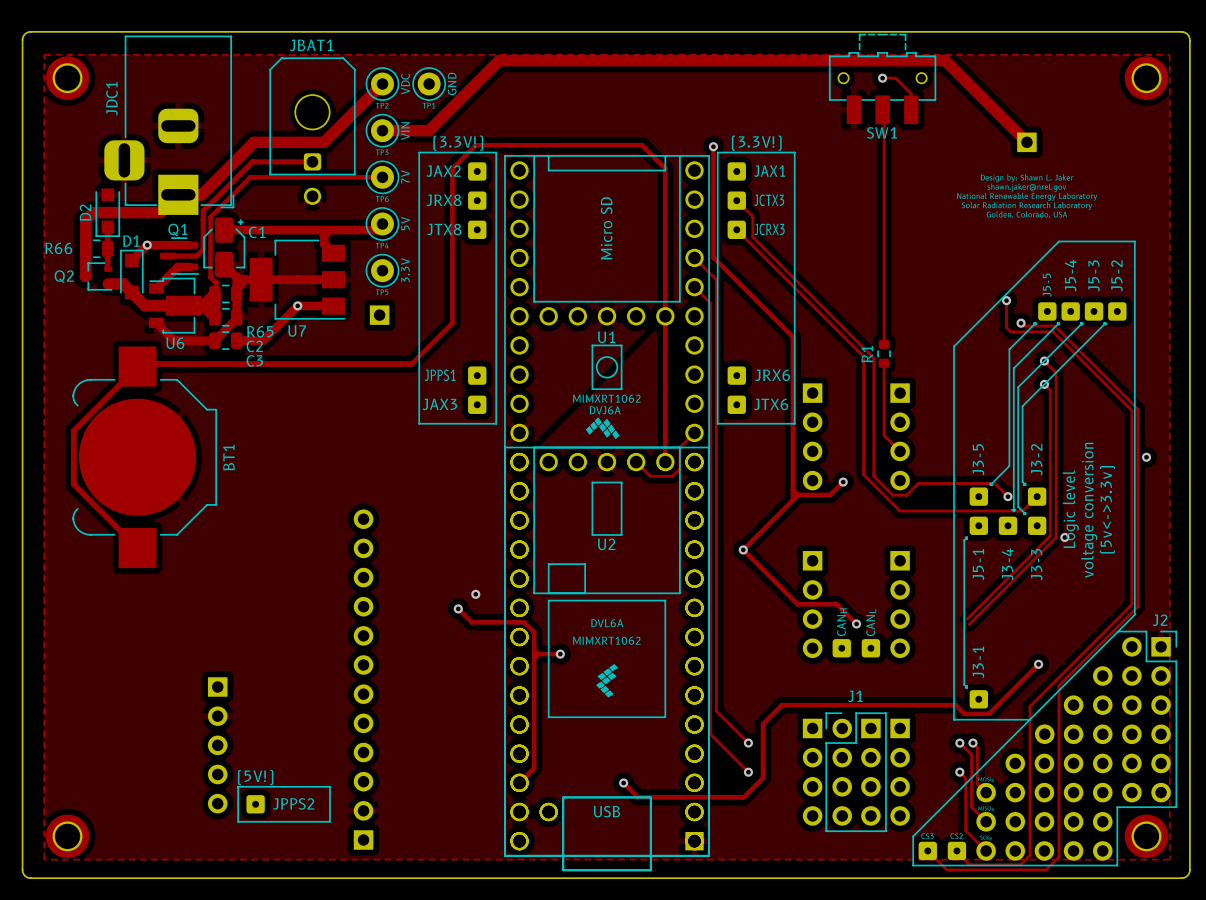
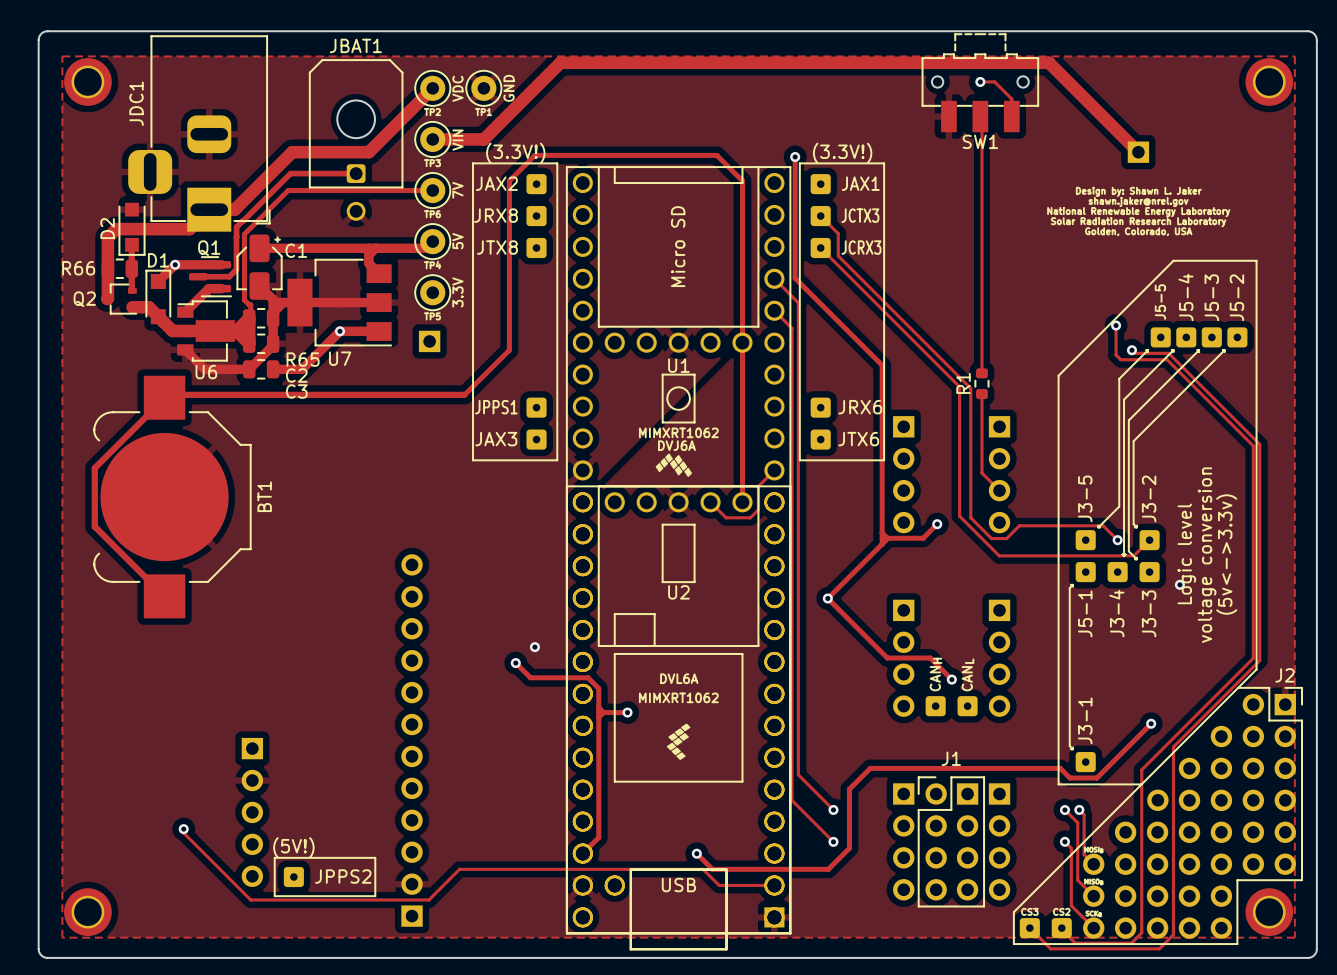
track: (1044, 361) (1056, 372) (1056, 537) (969, 624) -> none
via: (1044, 361) -> none
track: (1044, 384) (1050, 390) (1050, 535) (967, 619) -> none
via: (1044, 384) -> none
via: (1146, 457) -> none
track: none -> (183, 829) (183, 833) (250, 899) (428, 899) (459, 869) (703, 869) (719, 885) (774, 885)
via: none -> (183, 829)

